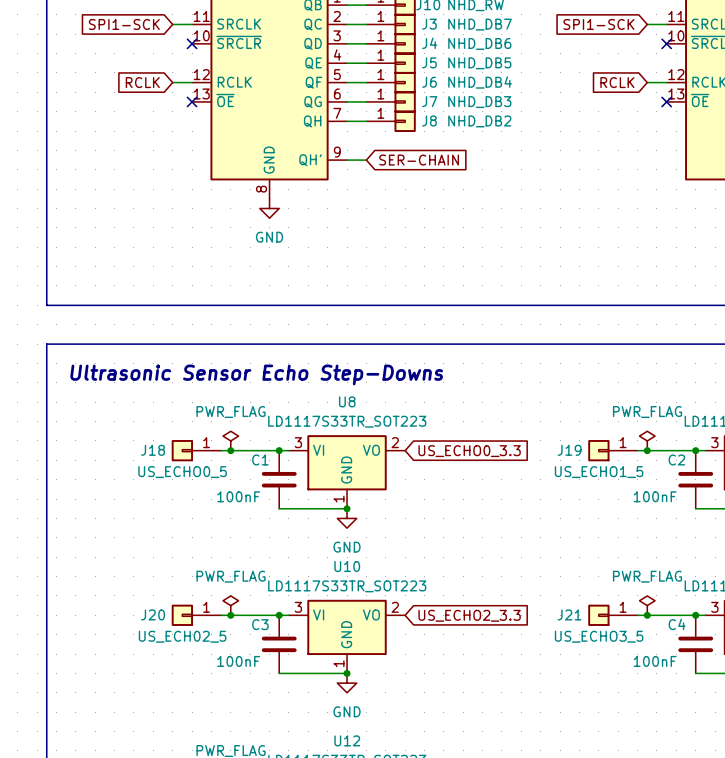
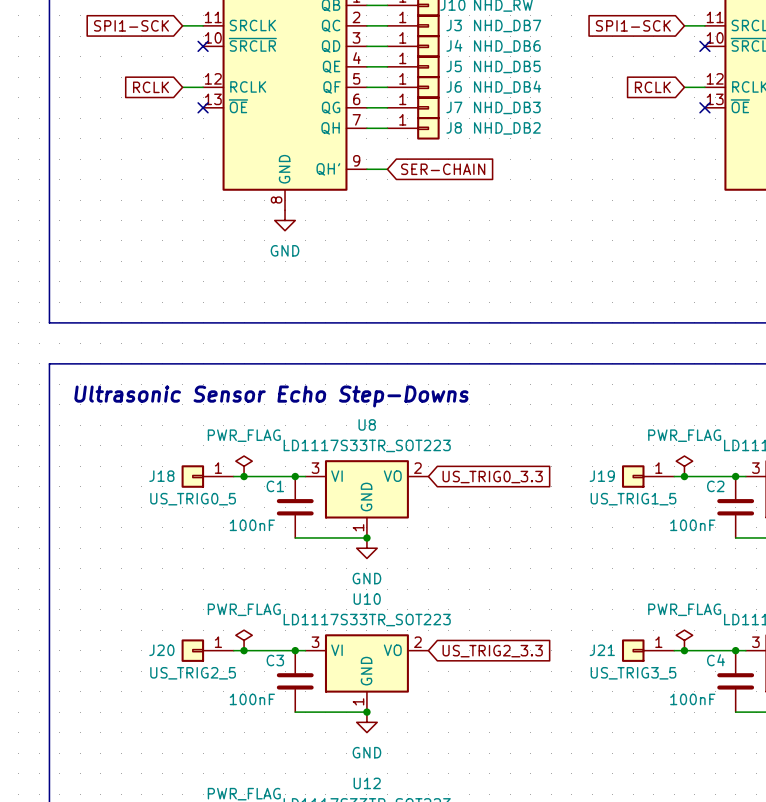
global label: US_ECHO0_3.3 (469, 451) -> US_TRIG0_3.3 (492, 477)
J18 value: US_ECHO0_5 (182, 472) -> US_TRIG0_5 (193, 499)
J19 value: US_ECHO1_5 (599, 472) -> US_TRIG1_5 (633, 499)
global label: US_ECHO2_3.3 (469, 615) -> US_TRIG2_3.3 (492, 651)
J20 value: US_ECH02_5 (182, 636) -> US_TRIG2_5 (193, 673)
J21 value: US_ECHO3_5 (599, 636) -> US_TRIG3_5 (633, 673)

